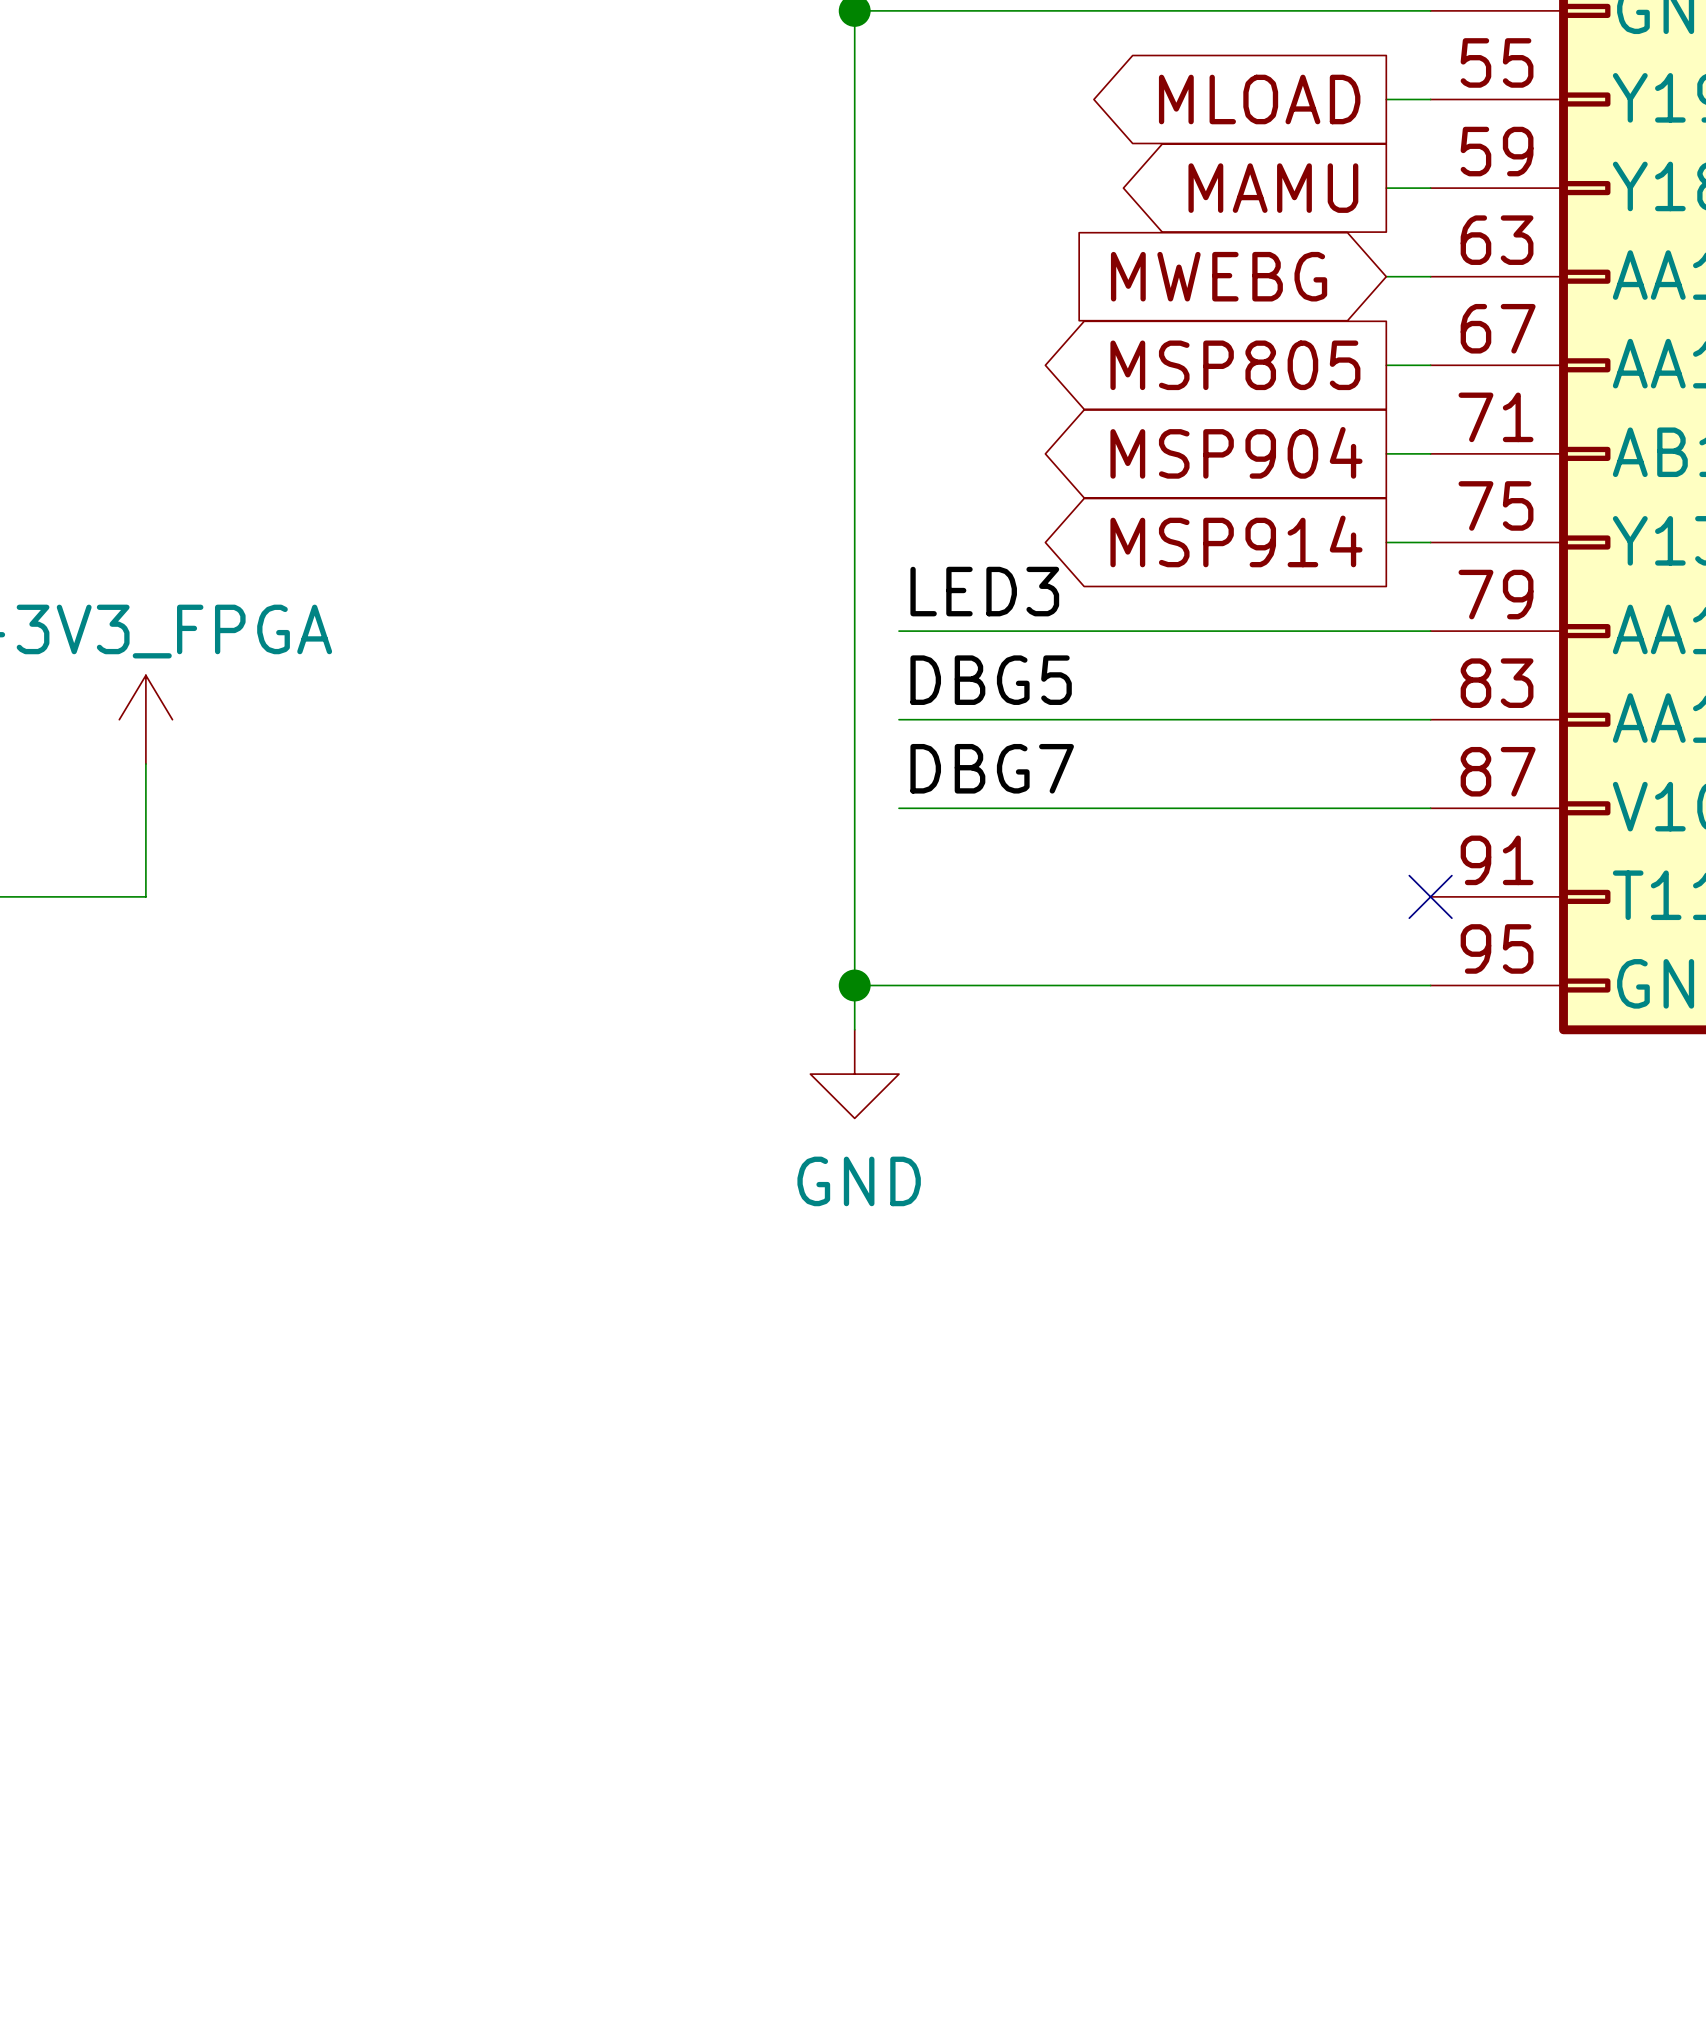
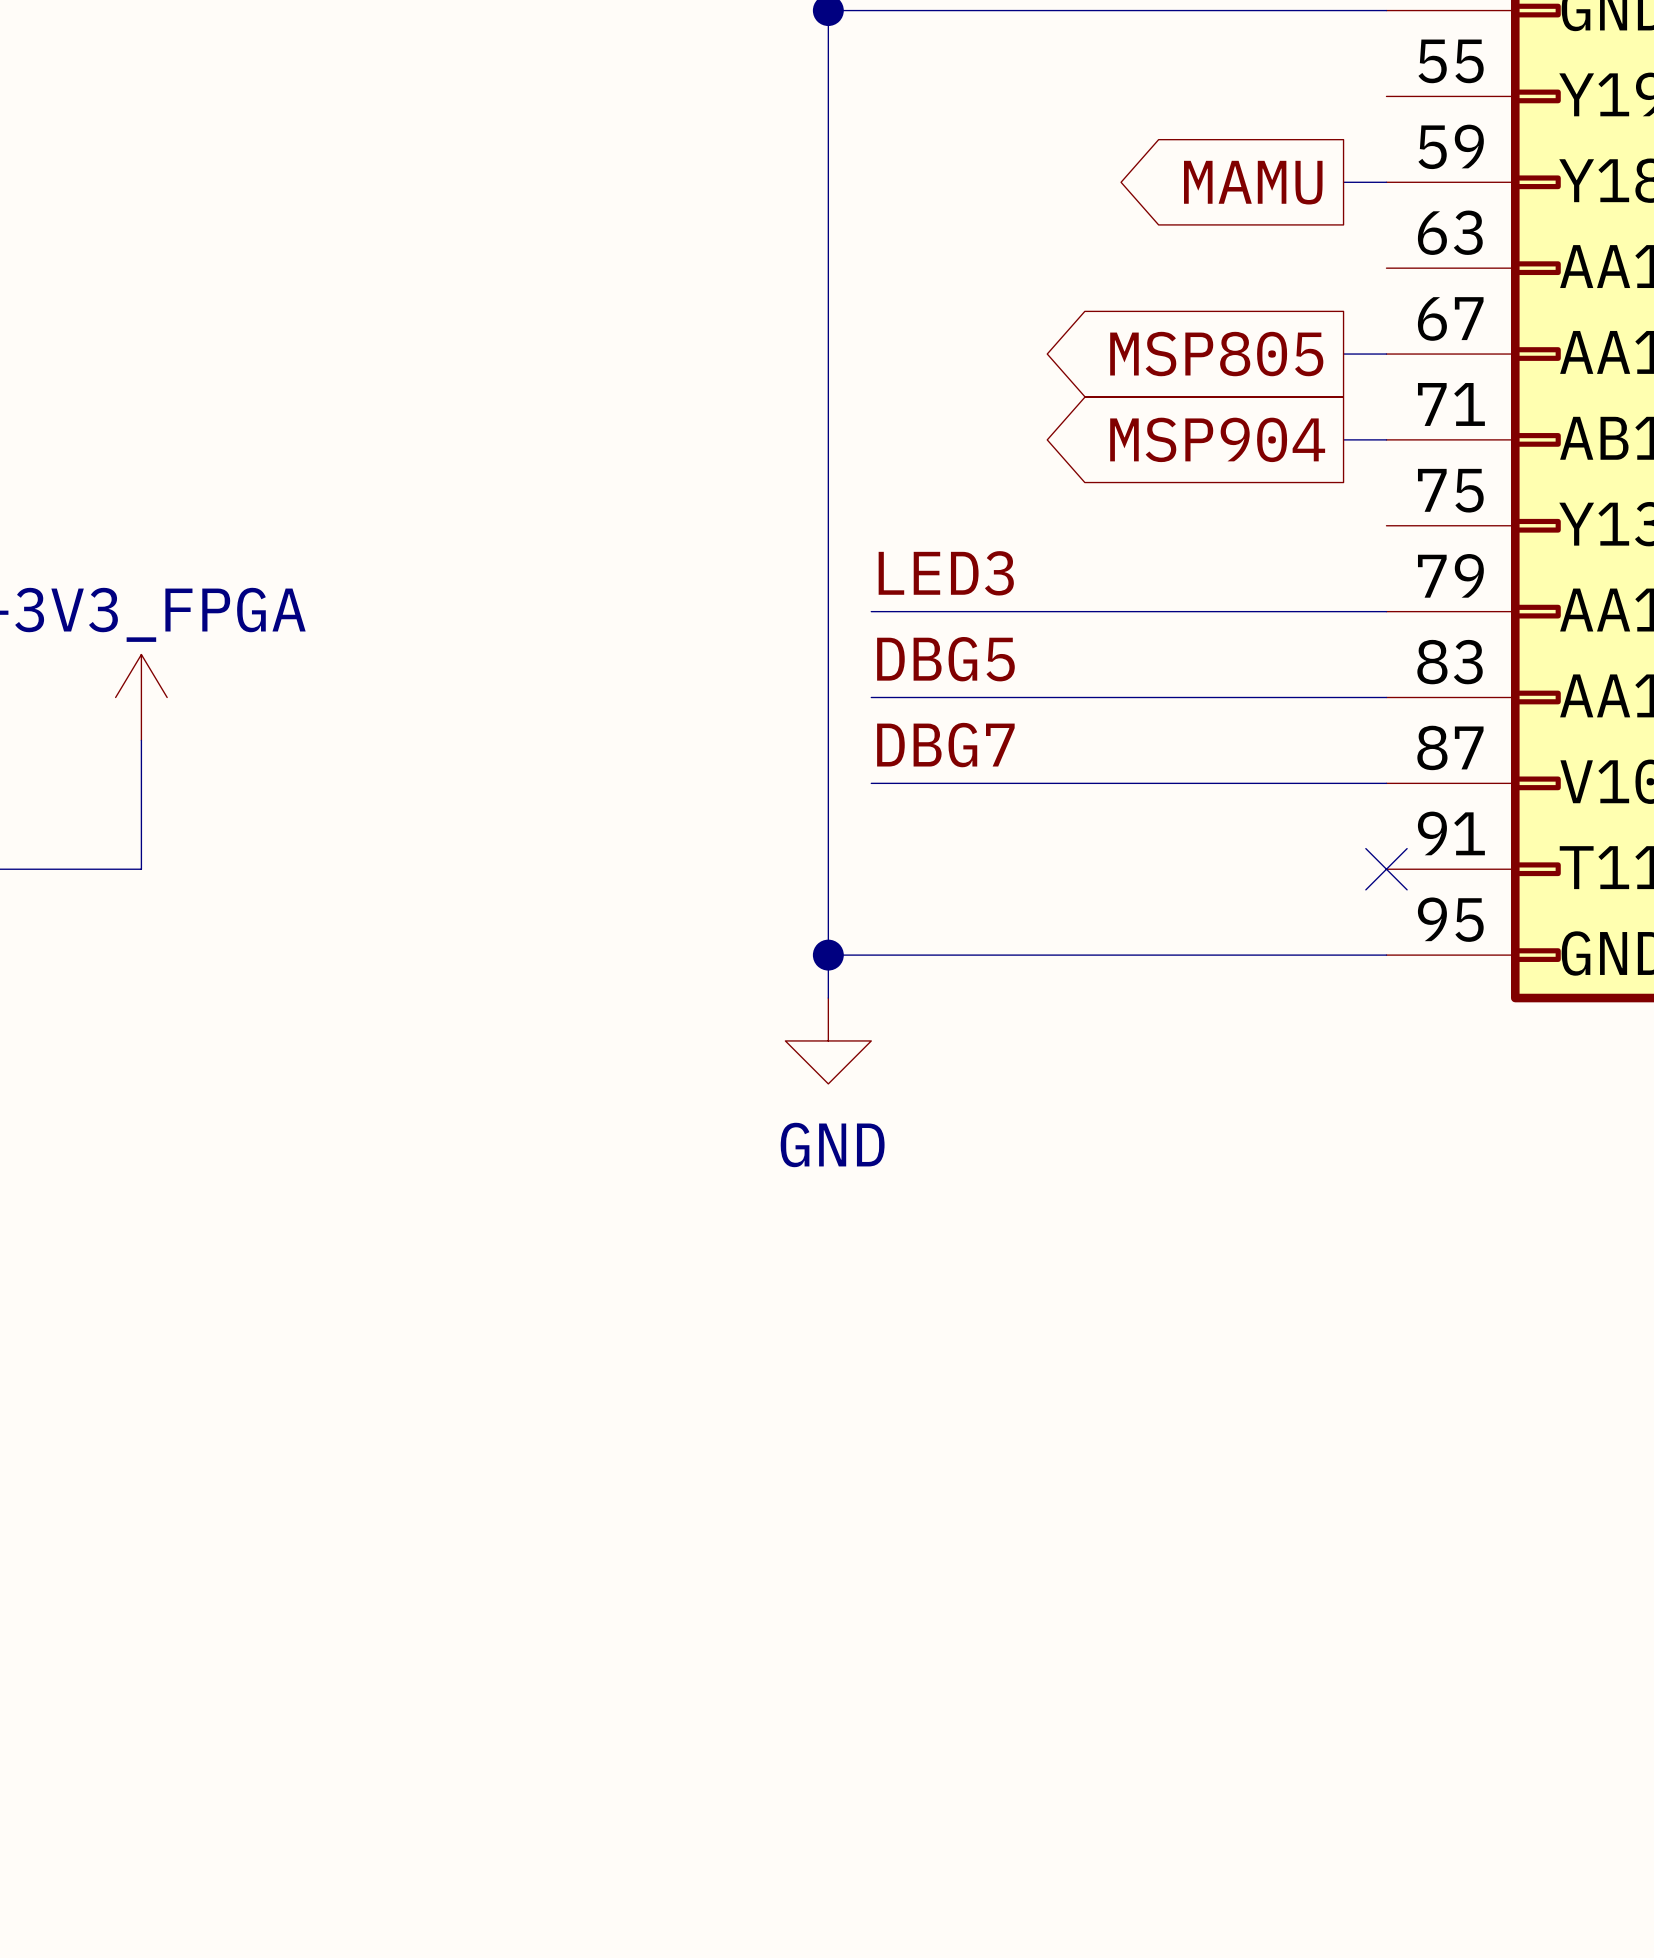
global label: MLOAD (1259, 99) -> none
wire: (1386, 99) (1430, 99) -> none
global label: MWEBG (1219, 276) -> none
wire: (1386, 276) (1430, 276) -> none
global label: MSP914 (1236, 541) -> none
wire: (1386, 542) (1430, 542) -> none

